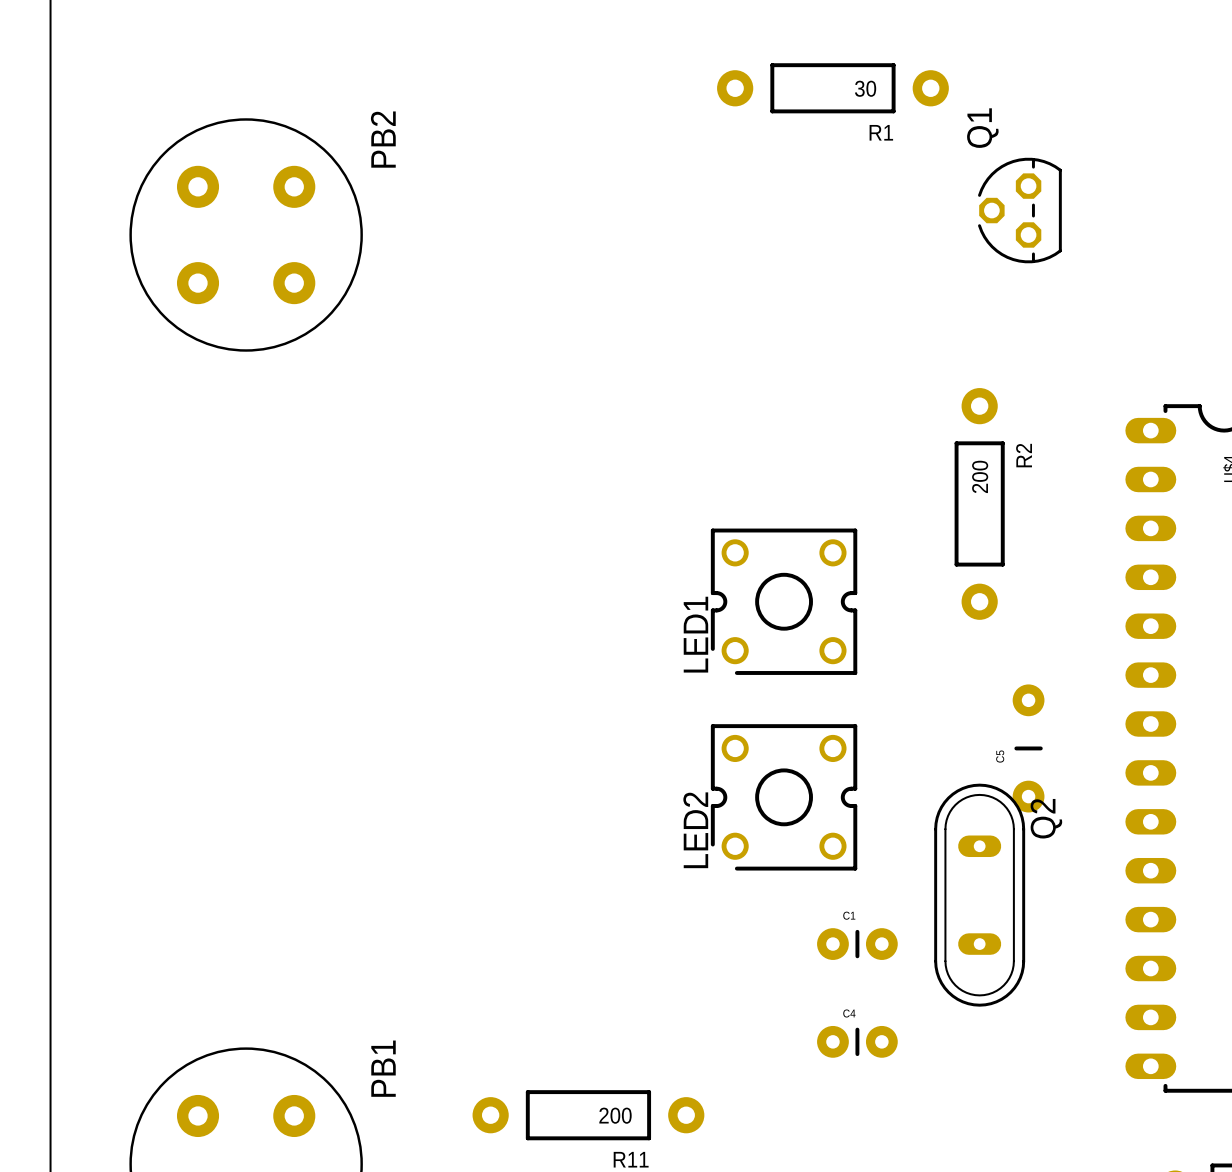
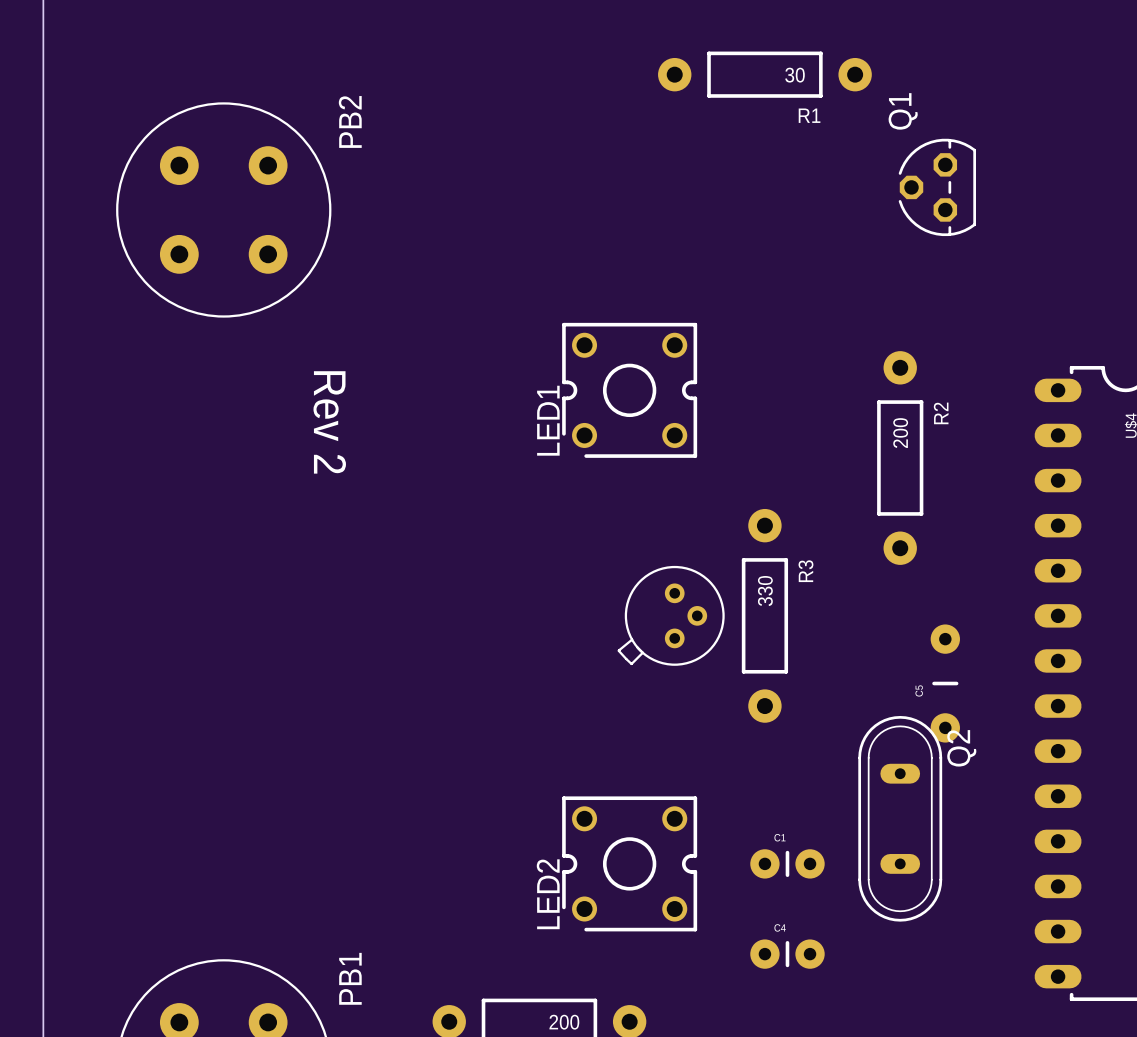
text: none -> Rev 2 (329, 422)
LED1 position: (784, 601) -> (629, 390)
part: none -> (671, 615)
R3: none -> 330 (764, 615)
LED2 position: (784, 797) -> (629, 863)

